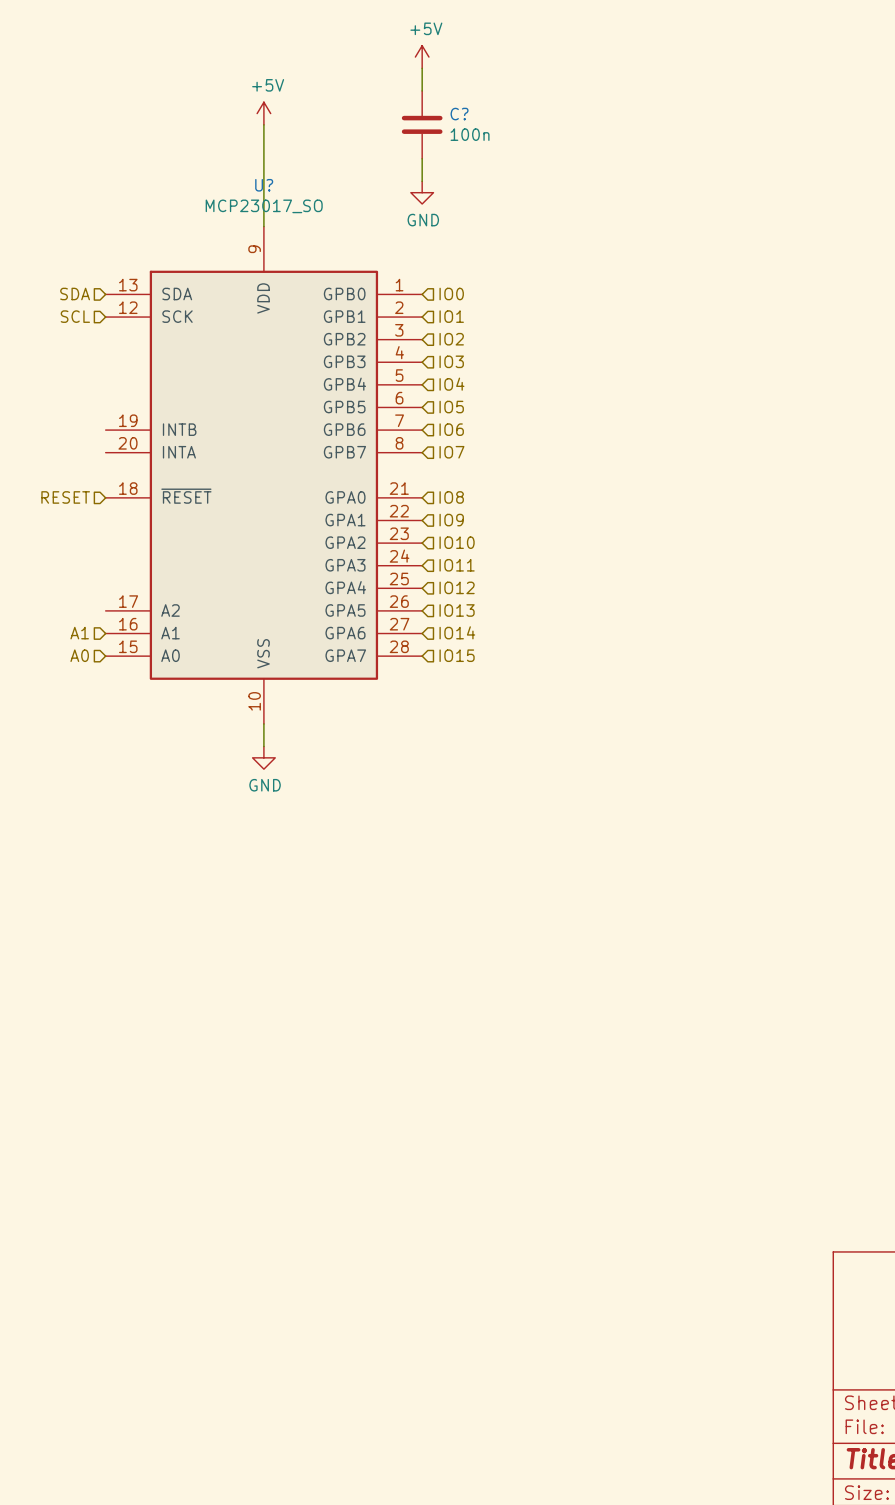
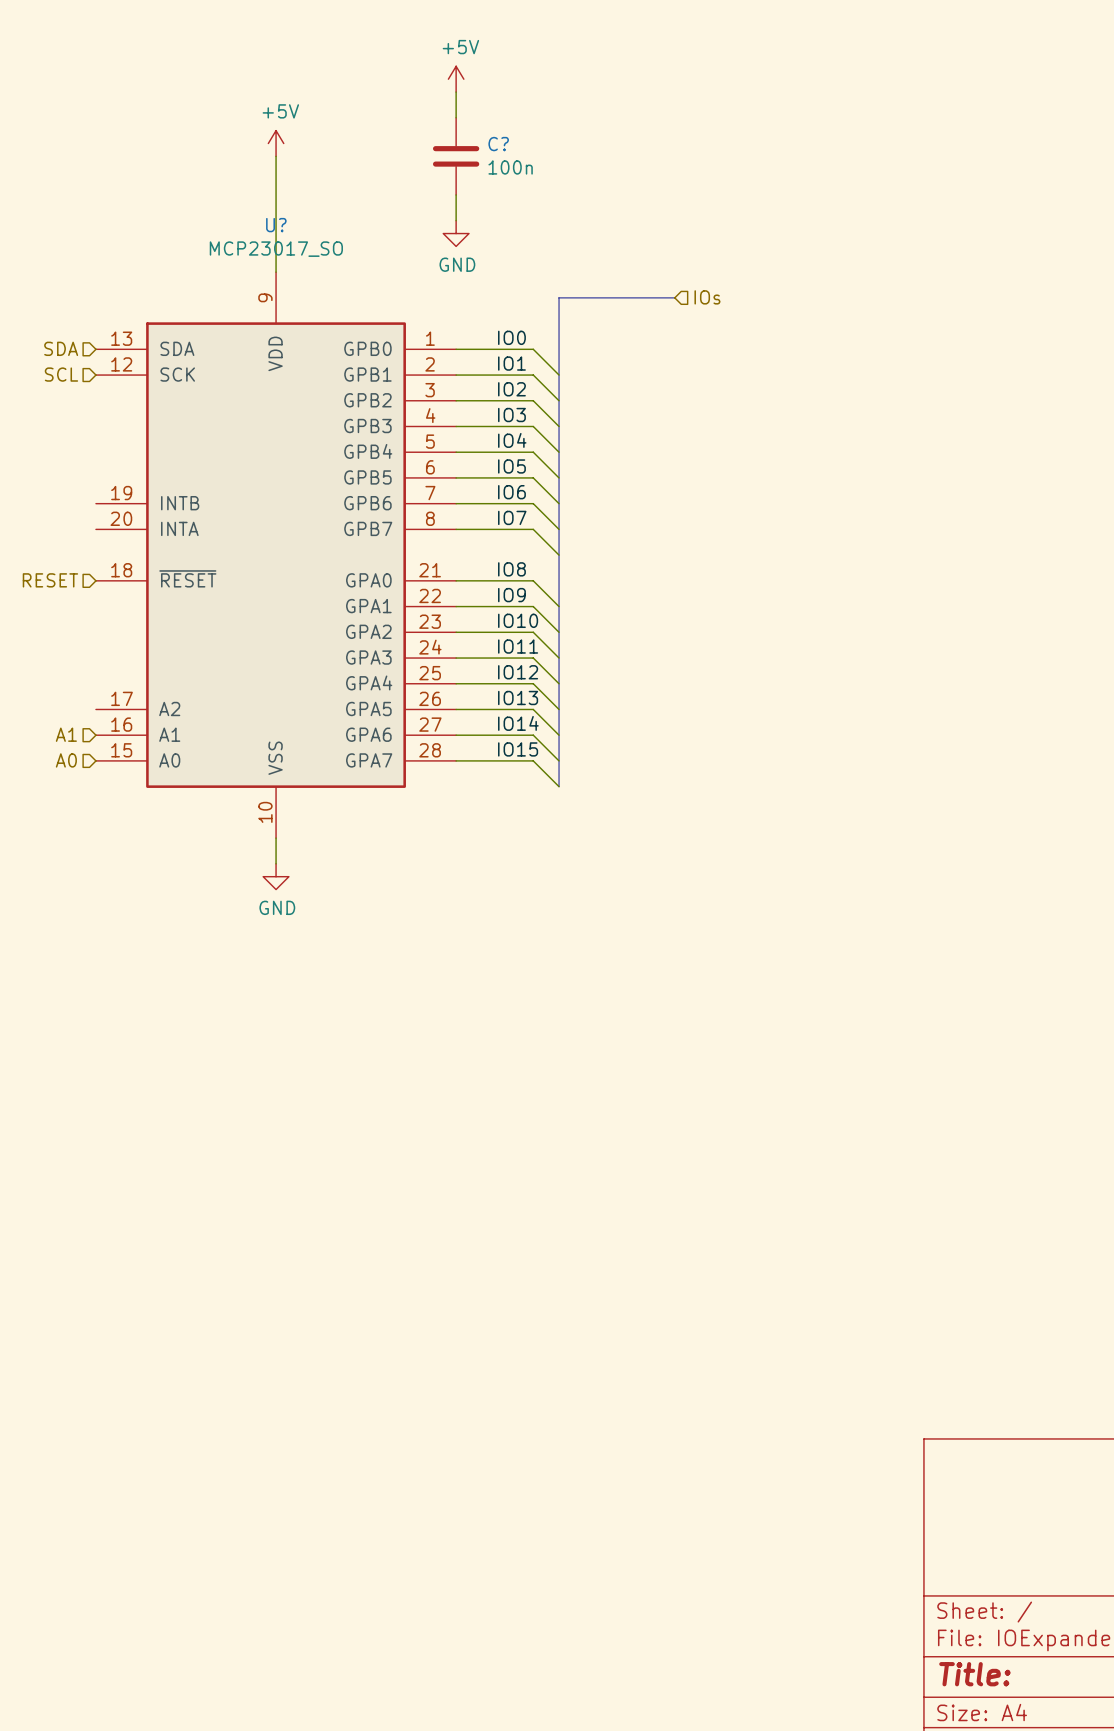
hierarchical label: none -> IOs (707, 297)
bus: none -> (674, 297) (559, 297) (559, 786)
label: none -> IO0 (511, 337)
wire: none -> (456, 349) (533, 349) (559, 375)
hierarchical label: IO0 (451, 294) -> none
label: none -> IO1 (511, 363)
hierarchical label: IO1 (451, 316) -> none
wire: none -> (456, 375) (533, 375) (559, 400)
label: none -> IO2 (511, 389)
wire: none -> (456, 400) (533, 400) (559, 426)
hierarchical label: IO2 (451, 339) -> none
label: none -> IO3 (511, 415)
hierarchical label: IO3 (451, 361) -> none
wire: none -> (456, 426) (533, 426) (559, 452)
label: none -> IO4 (512, 440)
wire: none -> (456, 452) (533, 452) (559, 477)
hierarchical label: IO4 (451, 384) -> none
label: none -> IO5 (511, 466)
wire: none -> (456, 477) (533, 477) (559, 503)
hierarchical label: IO5 (451, 407) -> none
label: none -> IO6 (511, 492)
hierarchical label: IO6 (451, 429) -> none
wire: none -> (456, 503) (533, 503) (559, 529)
label: none -> IO7 (512, 517)
wire: none -> (456, 529) (533, 529) (559, 555)
hierarchical label: IO7 (451, 452) -> none
label: none -> IO8 (511, 569)
wire: none -> (456, 580) (533, 580) (559, 606)
hierarchical label: IO8 (451, 497) -> none
label: none -> IO9 (511, 595)
wire: none -> (456, 606) (533, 606) (559, 632)
hierarchical label: IO9 (451, 520) -> none
label: none -> IO10 (518, 620)
hierarchical label: IO10 (457, 542) -> none
wire: none -> (456, 632) (533, 632) (559, 658)
label: none -> IO11 (518, 646)
wire: none -> (456, 658) (533, 658) (559, 683)
hierarchical label: IO11 (457, 565) -> none
label: none -> IO12 (518, 672)
hierarchical label: IO12 (457, 587) -> none
wire: none -> (456, 683) (533, 683) (559, 709)
label: none -> IO13 (518, 697)
wire: none -> (456, 709) (533, 709) (559, 735)
hierarchical label: IO13 (457, 610) -> none
label: none -> IO14 (518, 723)
hierarchical label: IO14 (457, 632) -> none
wire: none -> (456, 735) (533, 735) (559, 760)
label: none -> IO15 (518, 749)
hierarchical label: IO15 (457, 655) -> none
wire: none -> (456, 760) (533, 760) (559, 786)

